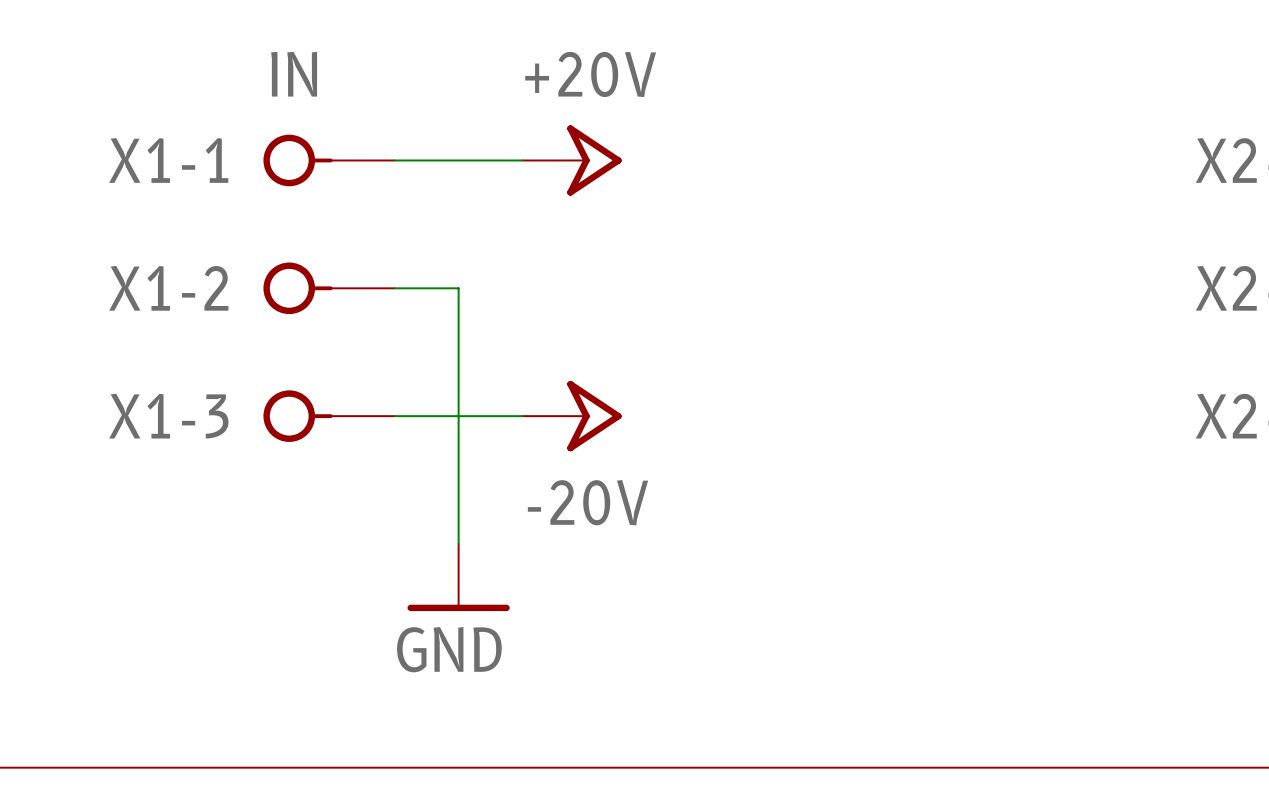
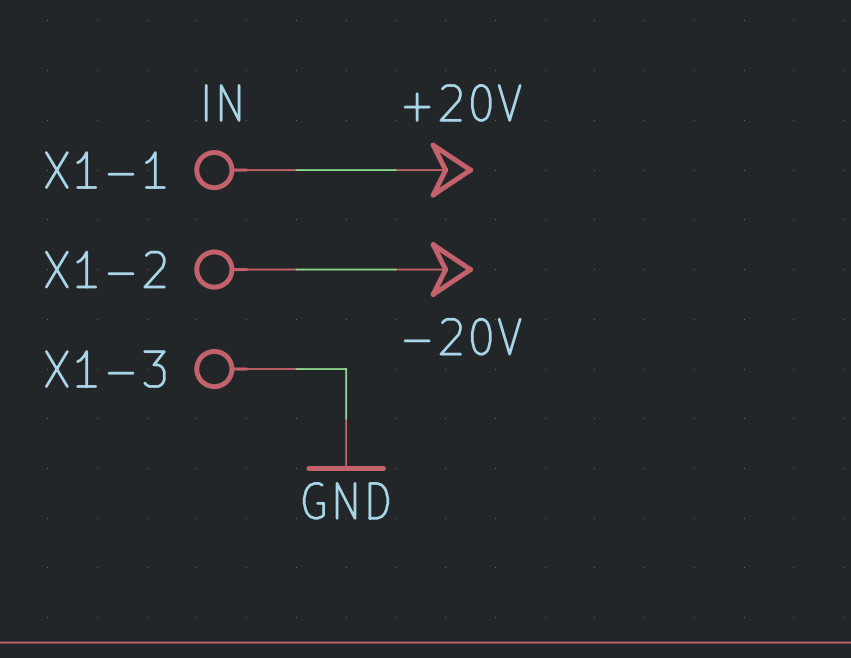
wire: (458, 288) (458, 416) (522, 416) -> (346, 269) (395, 269)
power symbol position: -20V (572, 416) -> -20V (434, 269)
power symbol position: GND (458, 577) -> GND (346, 444)

